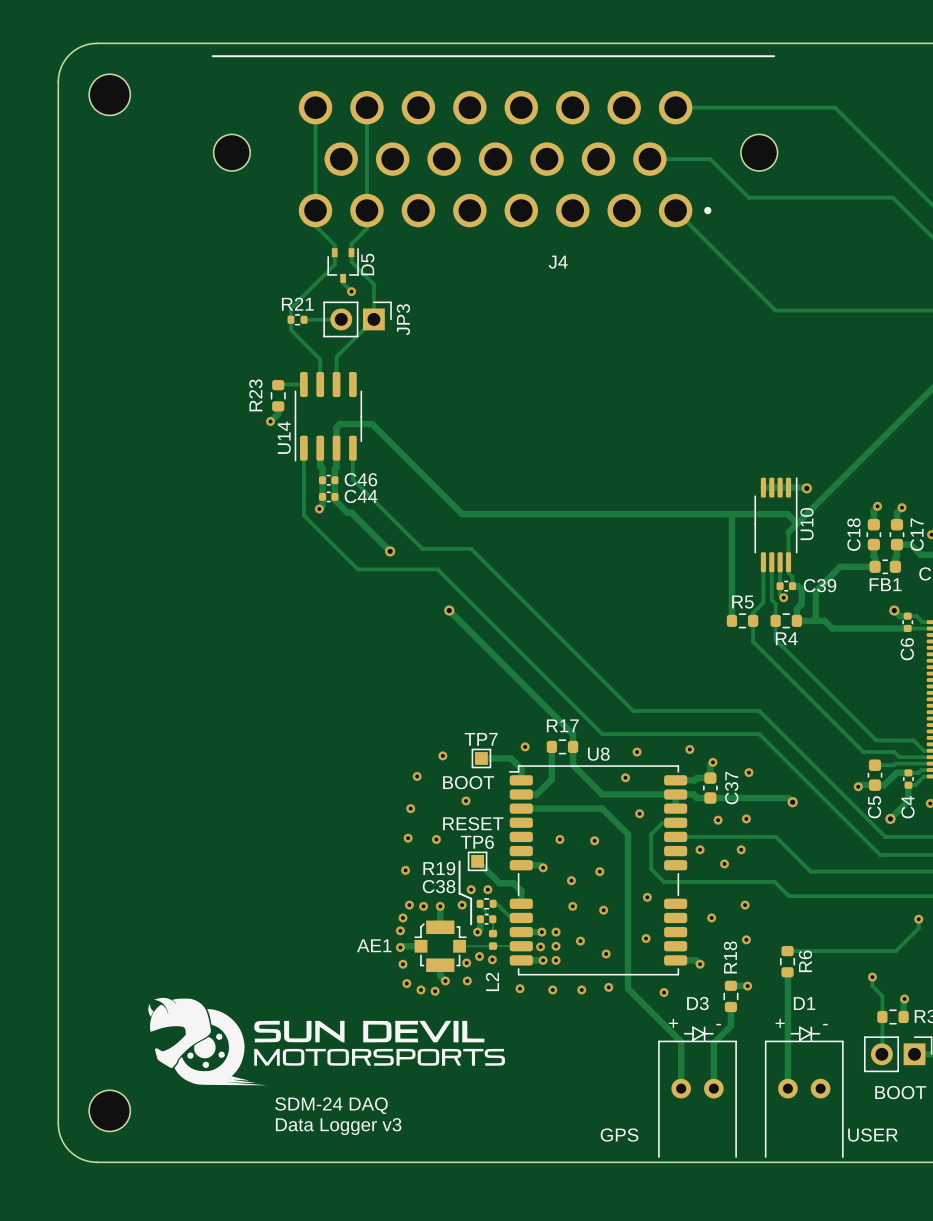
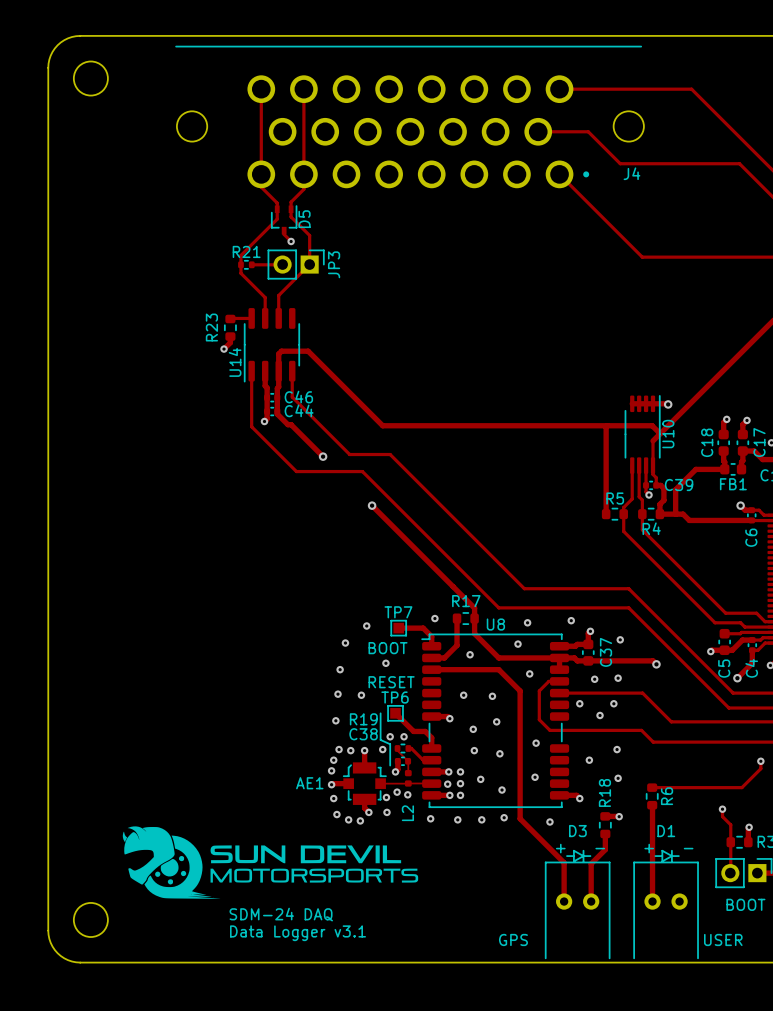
J4 name position: J4 (558, 262) -> J4 (631, 173)
via: none -> (470, 654)
text: Data Logger v3 (338, 1126) -> Data Logger v3.1 (298, 933)

